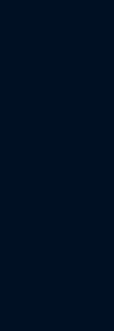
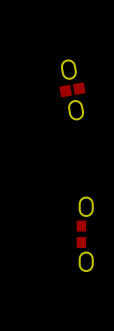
part: none -> (72, 89)
part: none -> (85, 234)

